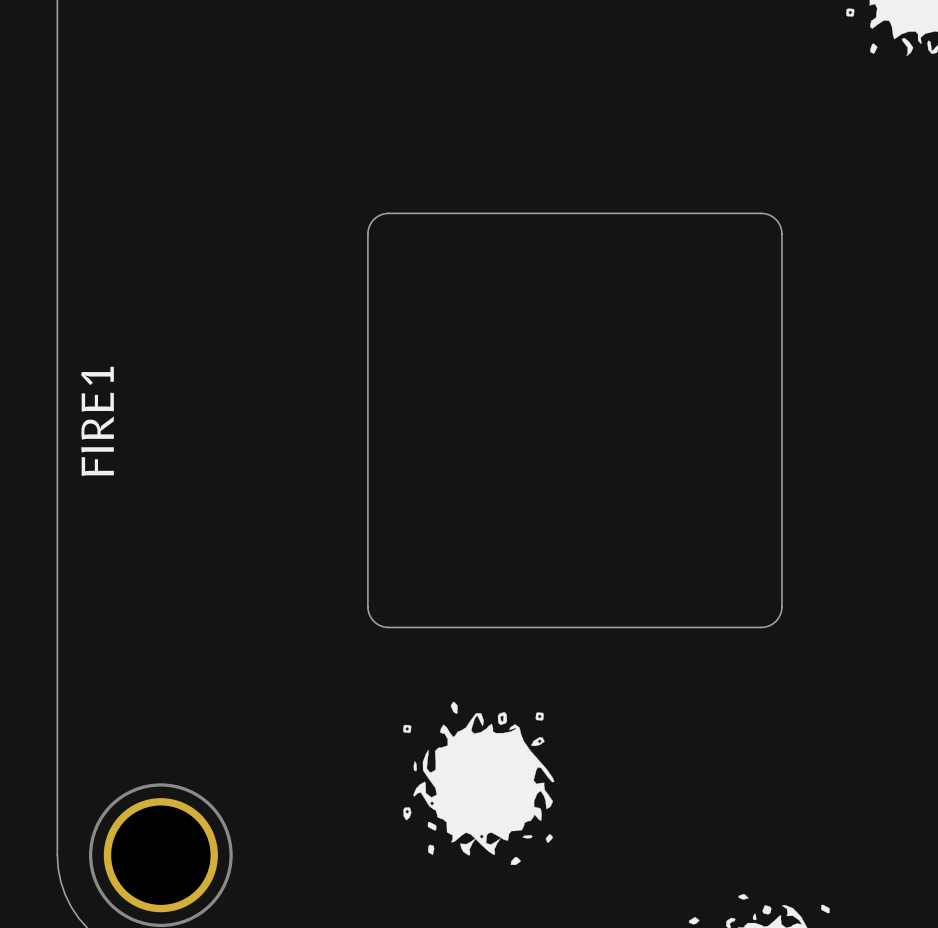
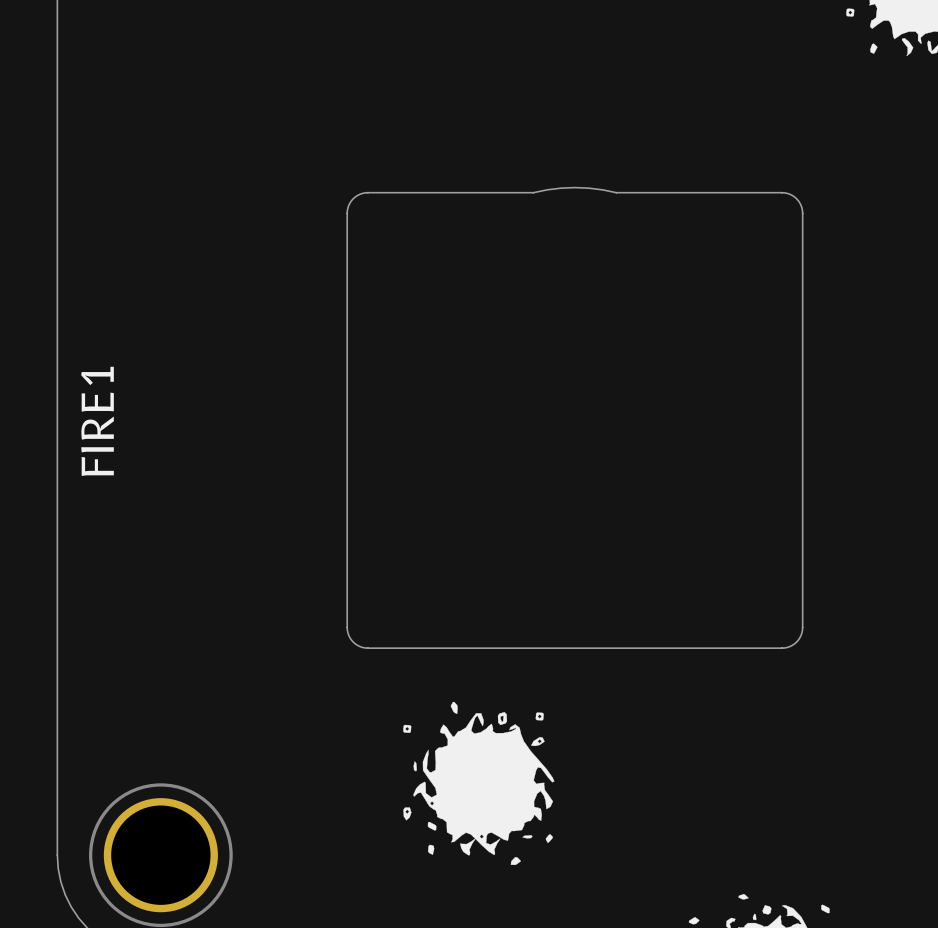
board edge: none -> (616, 192) (574, 187) (533, 192) (367, 192) (357, 195) (349, 203) (347, 213) (347, 627) (348, 635) (353, 642) (359, 646) (367, 648)
board edge: none -> (616, 192) (781, 192)
board edge: none -> (781, 192) (789, 194) (796, 198) (801, 205) (802, 213) (802, 627) (801, 635) (796, 642) (789, 646) (781, 648) (367, 648)
board edge: (388, 213) (761, 213) (769, 214) (775, 219) (780, 226) (781, 234) (781, 606) (780, 614) (775, 621) (769, 625) (761, 627) (388, 627) (380, 625) (373, 621) (369, 614) (367, 606) (367, 234) (369, 226) (373, 219) (380, 214) (388, 213) -> none

